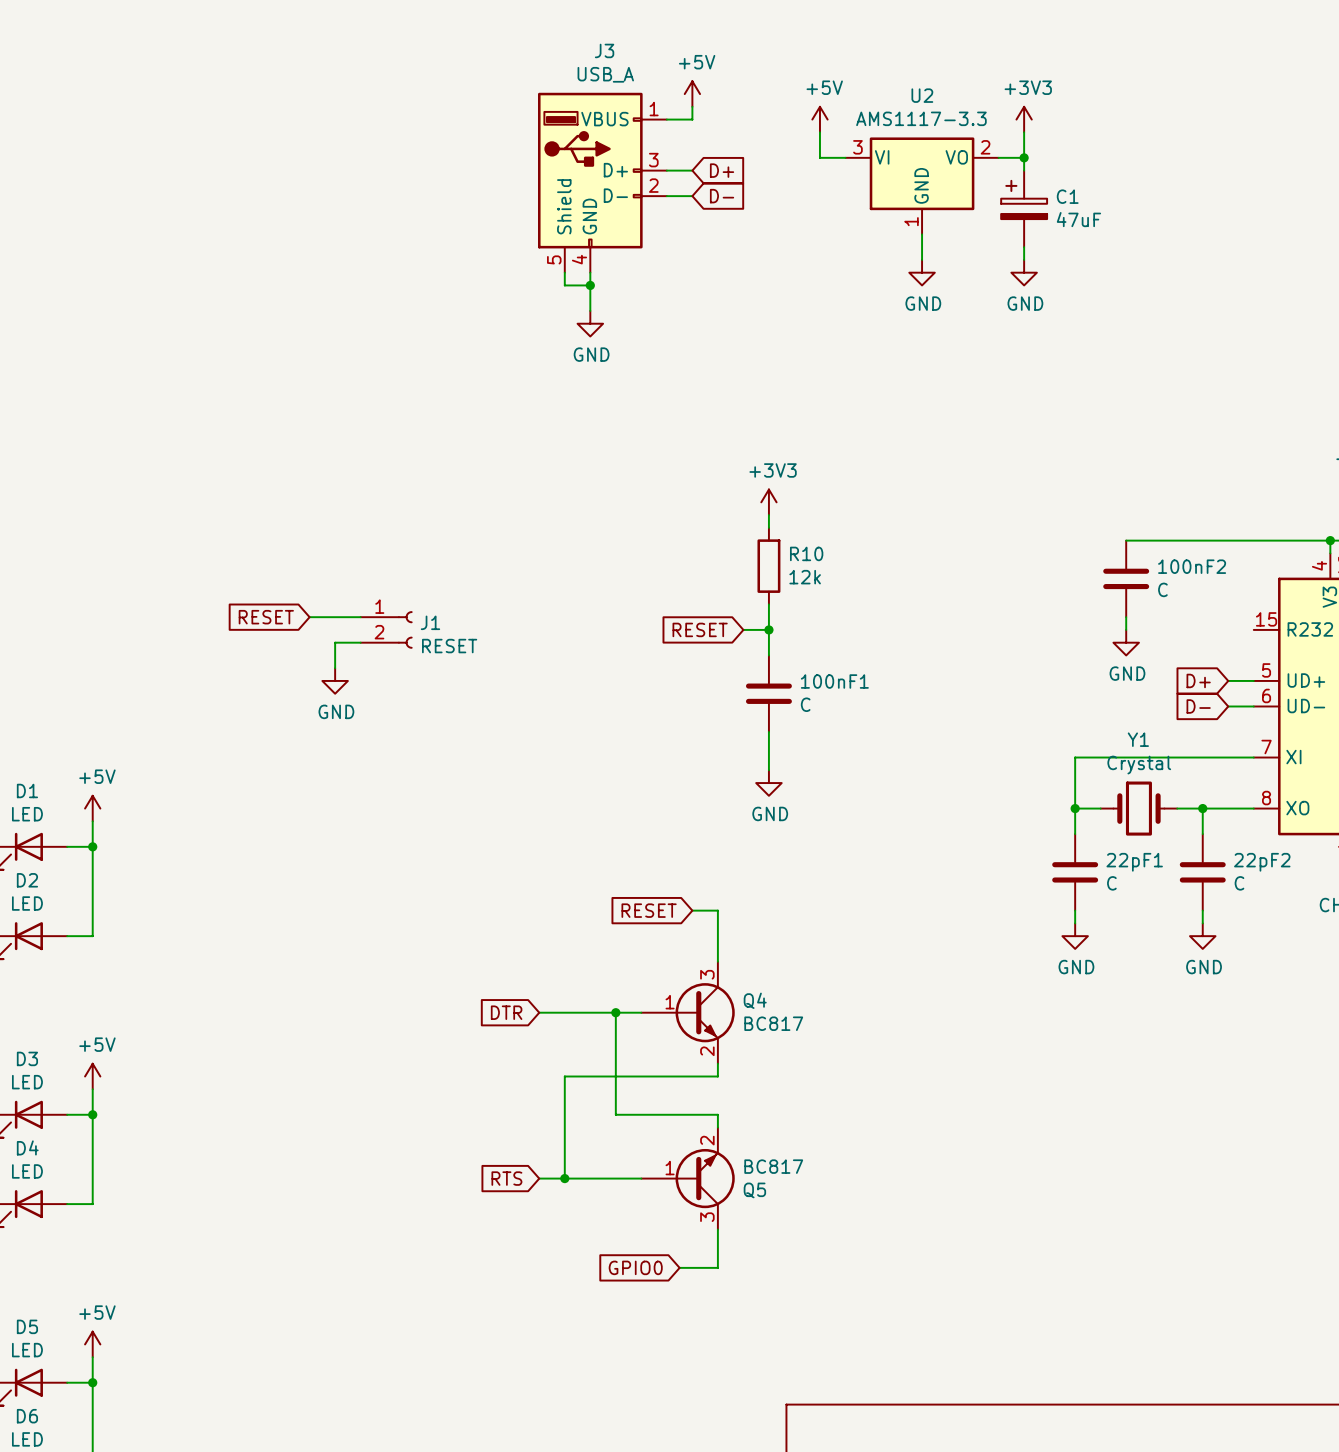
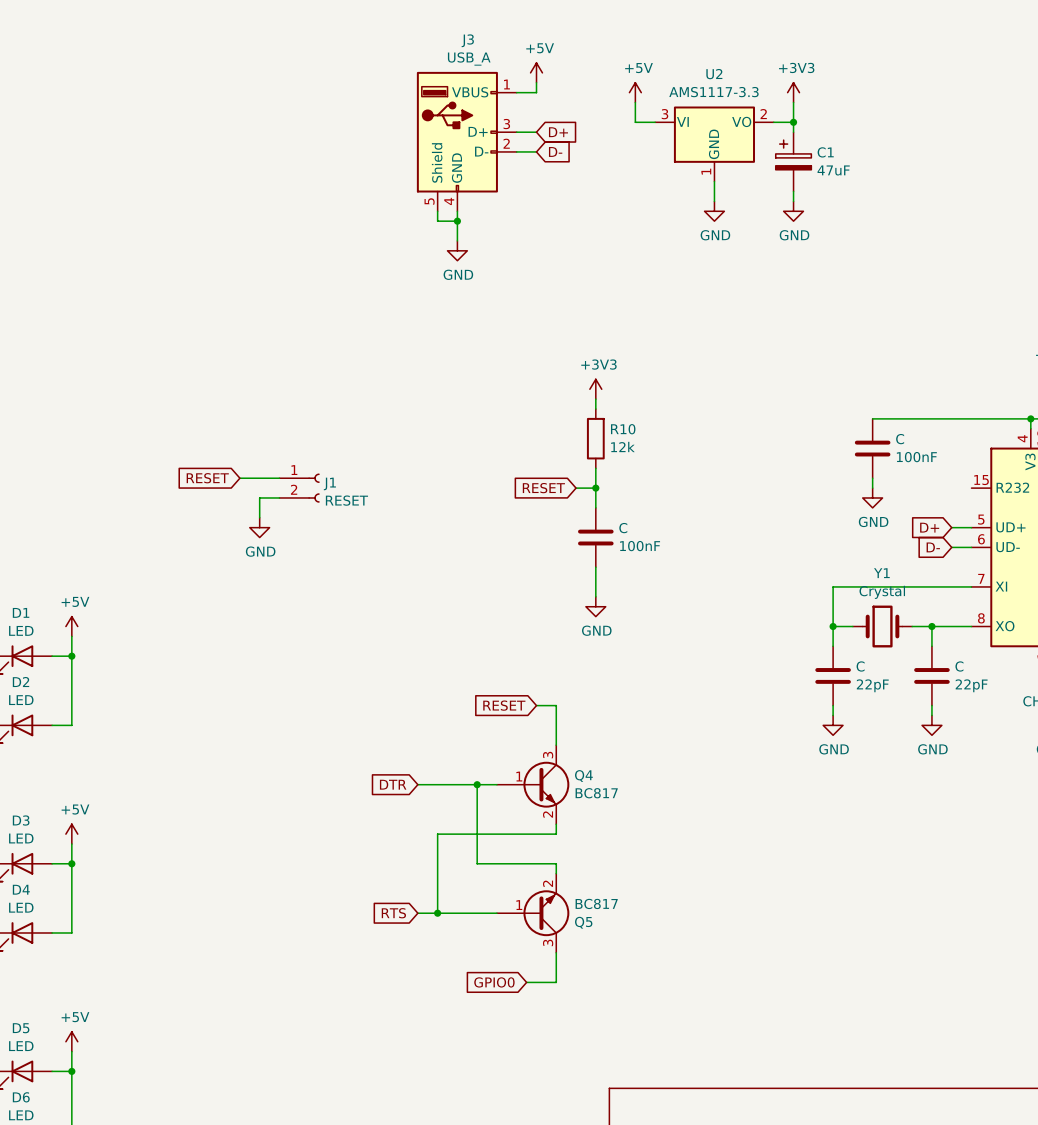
100nF2 name: 100nF2 (1192, 566) -> C (900, 439)
100nF2 value: C (1162, 589) -> 100nF (916, 457)
100nF1 name: 100nF1 (834, 681) -> C (623, 528)
100nF1 value: C (805, 704) -> 100nF (640, 546)
22pF1 name: 22pF1 (1134, 862) -> C (860, 666)
22pF2 name: 22pF2 (1262, 862) -> C (959, 666)
22pF1 value: C (1111, 883) -> 22pF (872, 685)
22pF2 value: C (1239, 883) -> 22pF (971, 685)

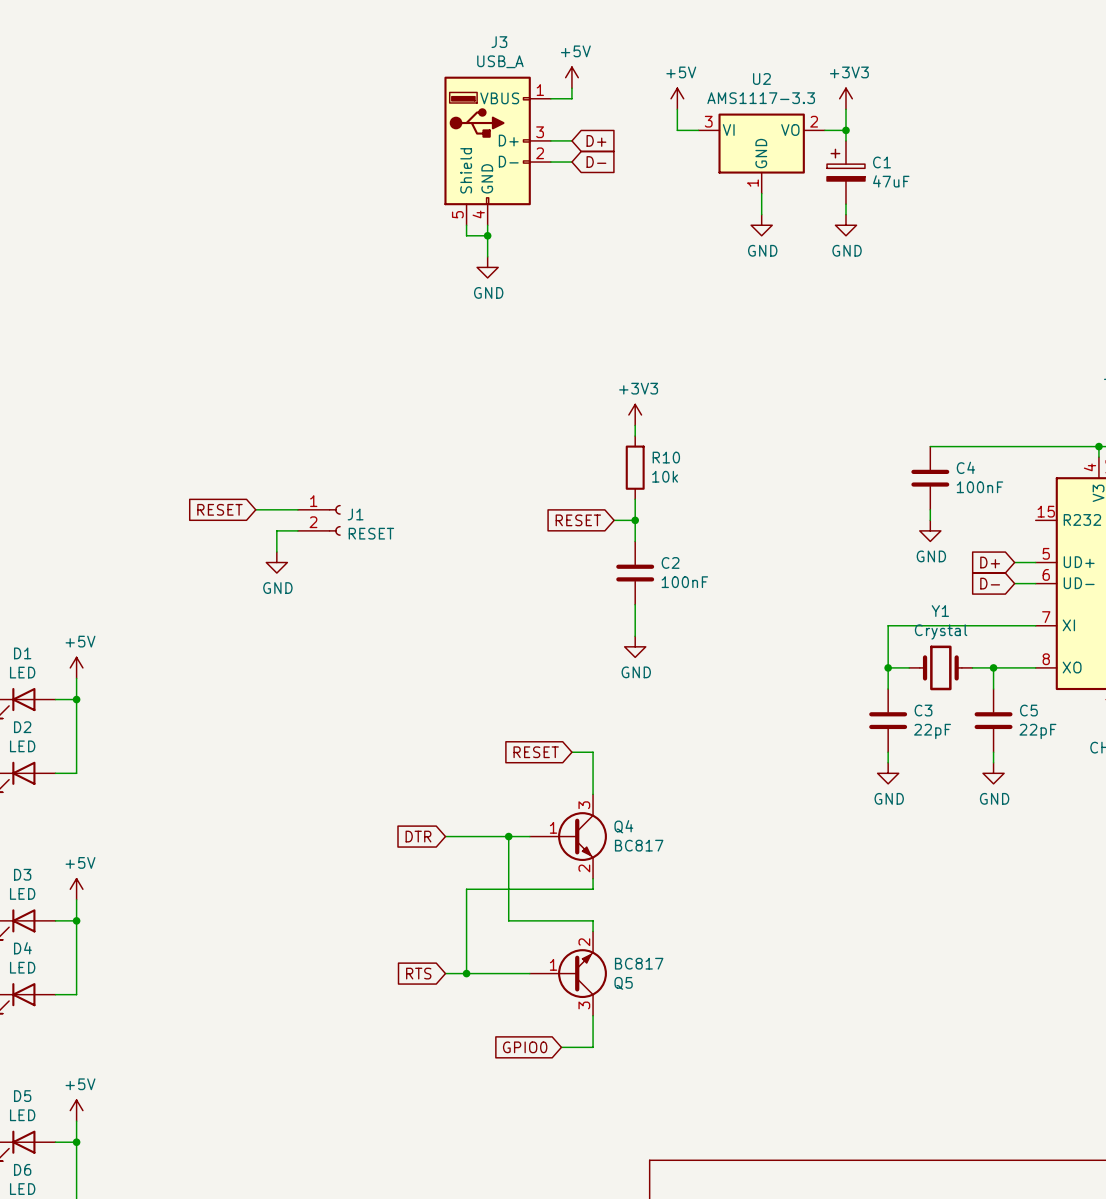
C name: C (900, 439) -> C4 (965, 467)
R10 value: 12k (622, 446) -> 10k (665, 476)
C name: C (623, 528) -> C2 (670, 562)
C name: C (860, 666) -> C3 (923, 710)
C name: C (959, 666) -> C5 (1028, 710)

